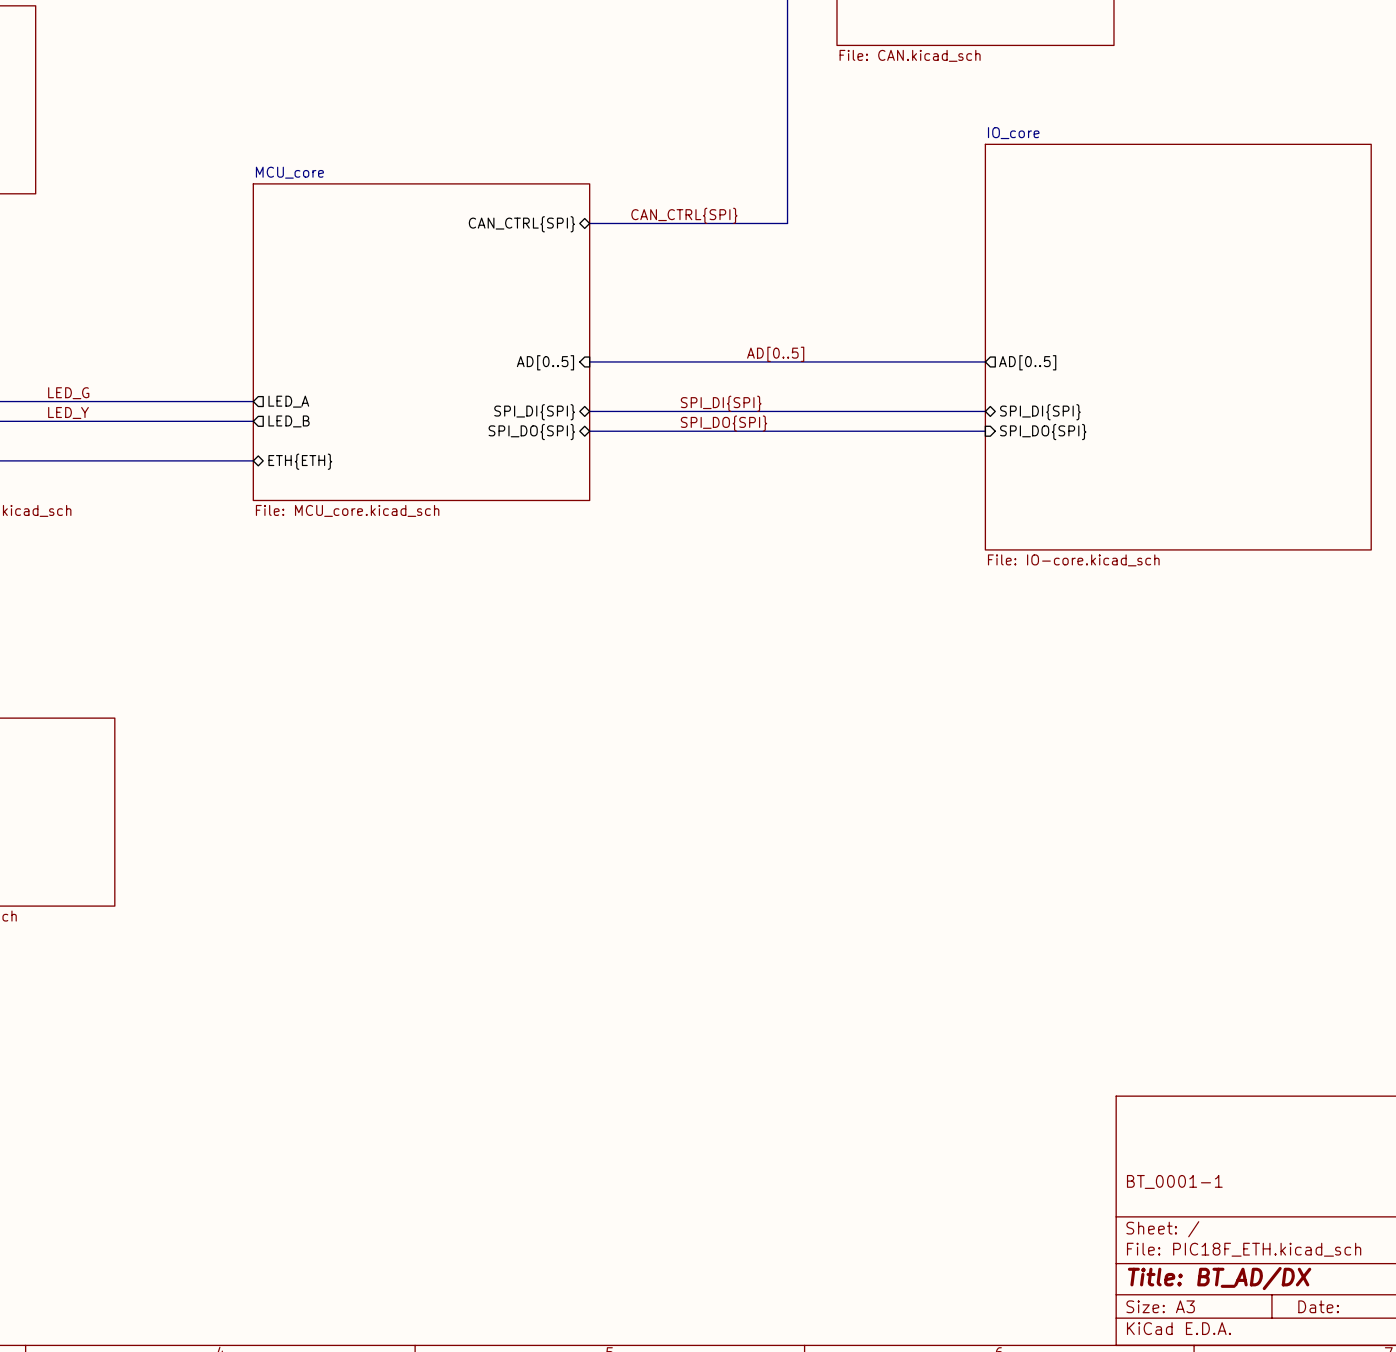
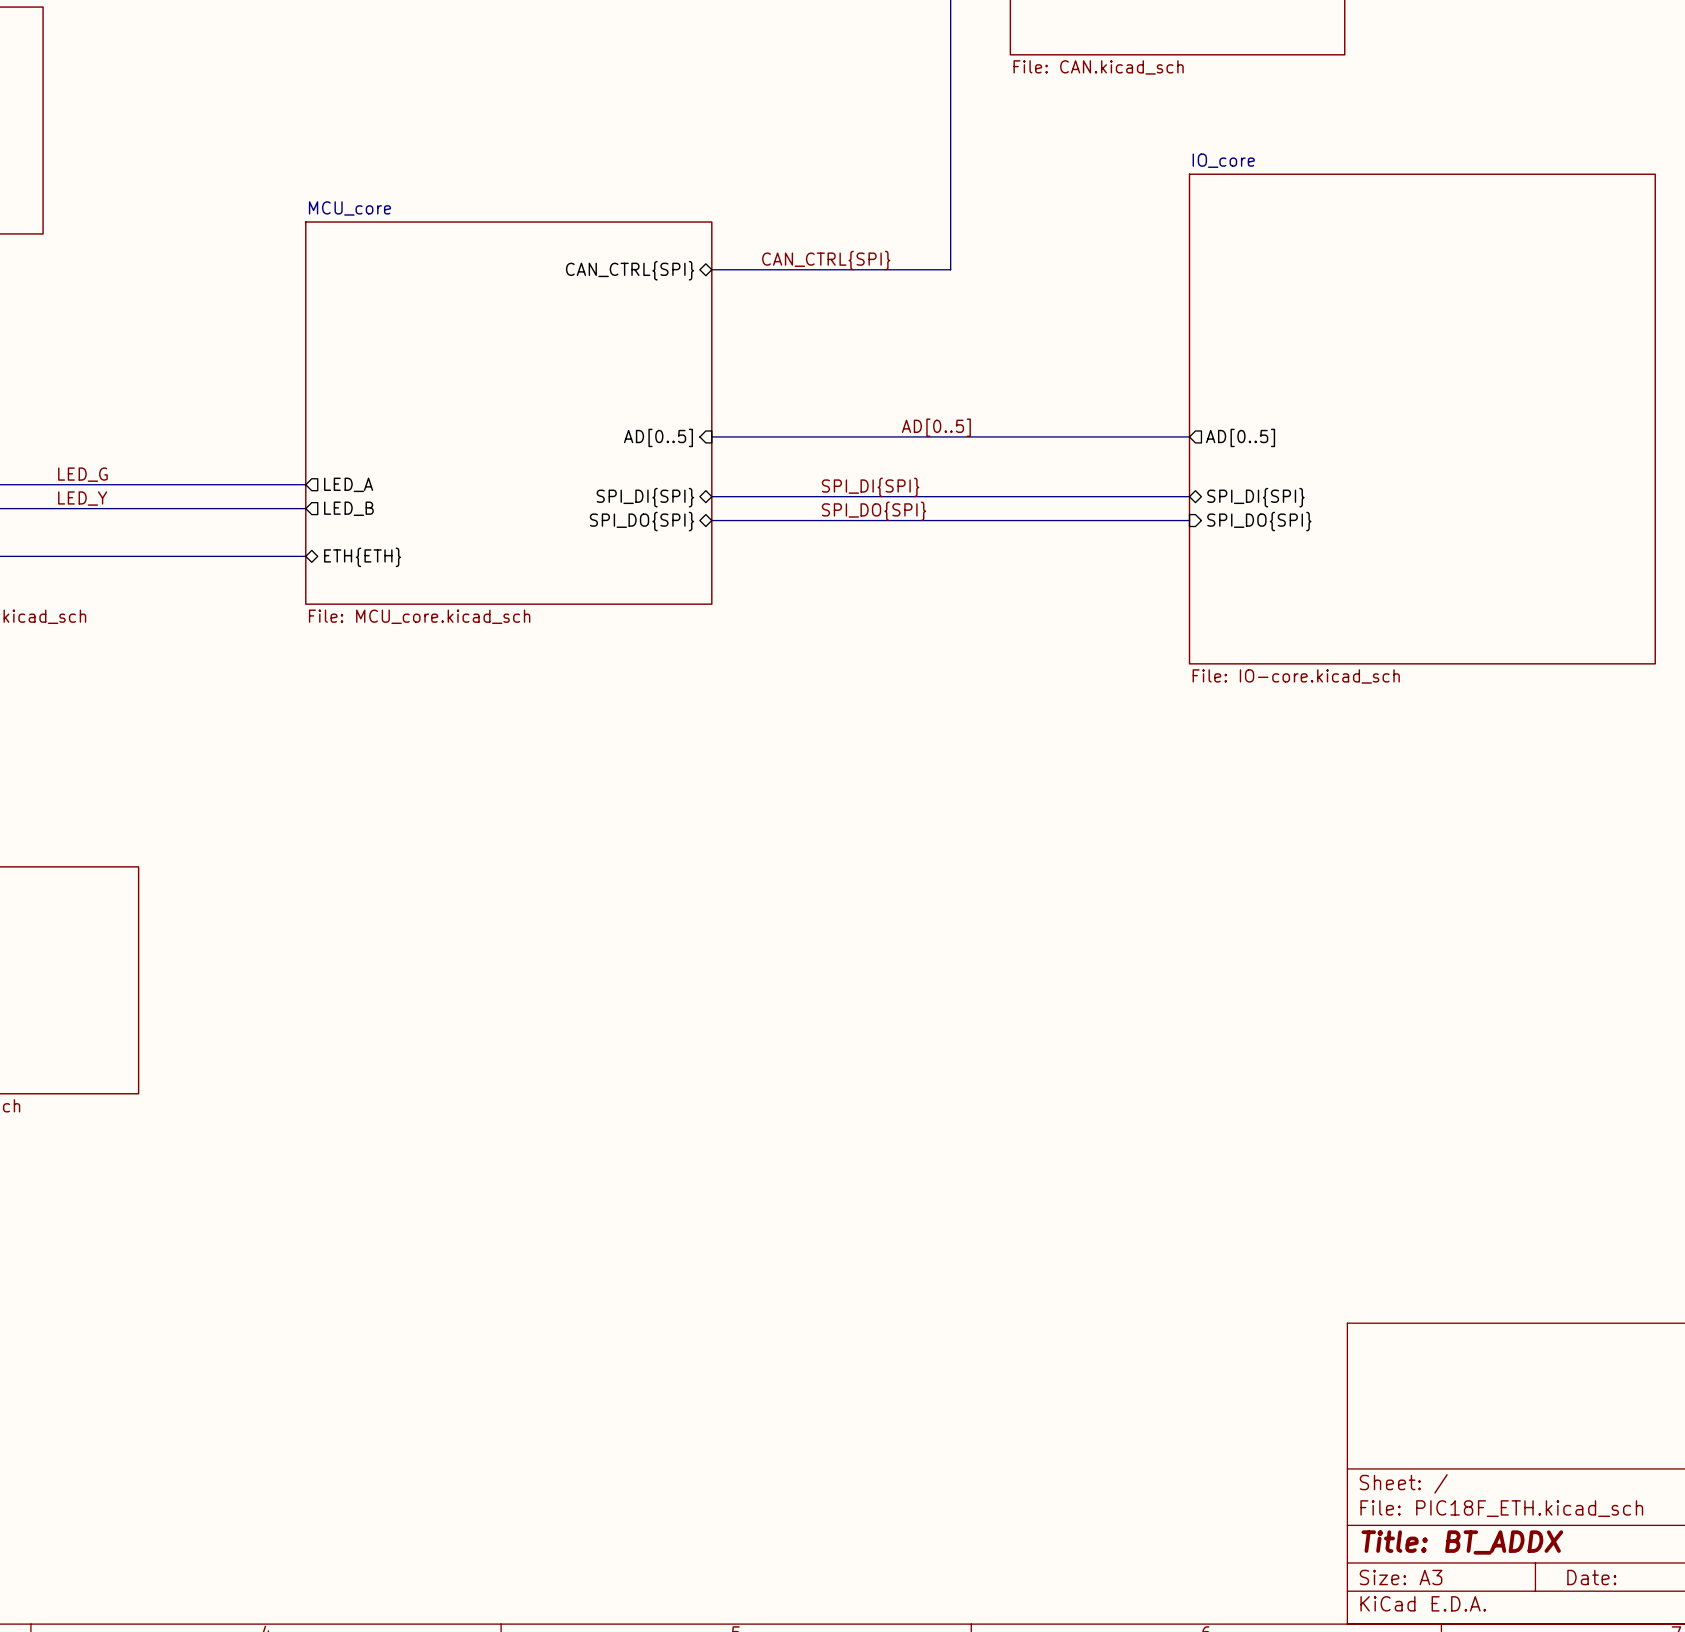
title block: BT_0001-1 (1174, 1181) -> none
title block: Title: BT_AD/DX (1219, 1278) -> Title: BT_ADDX (1462, 1542)

